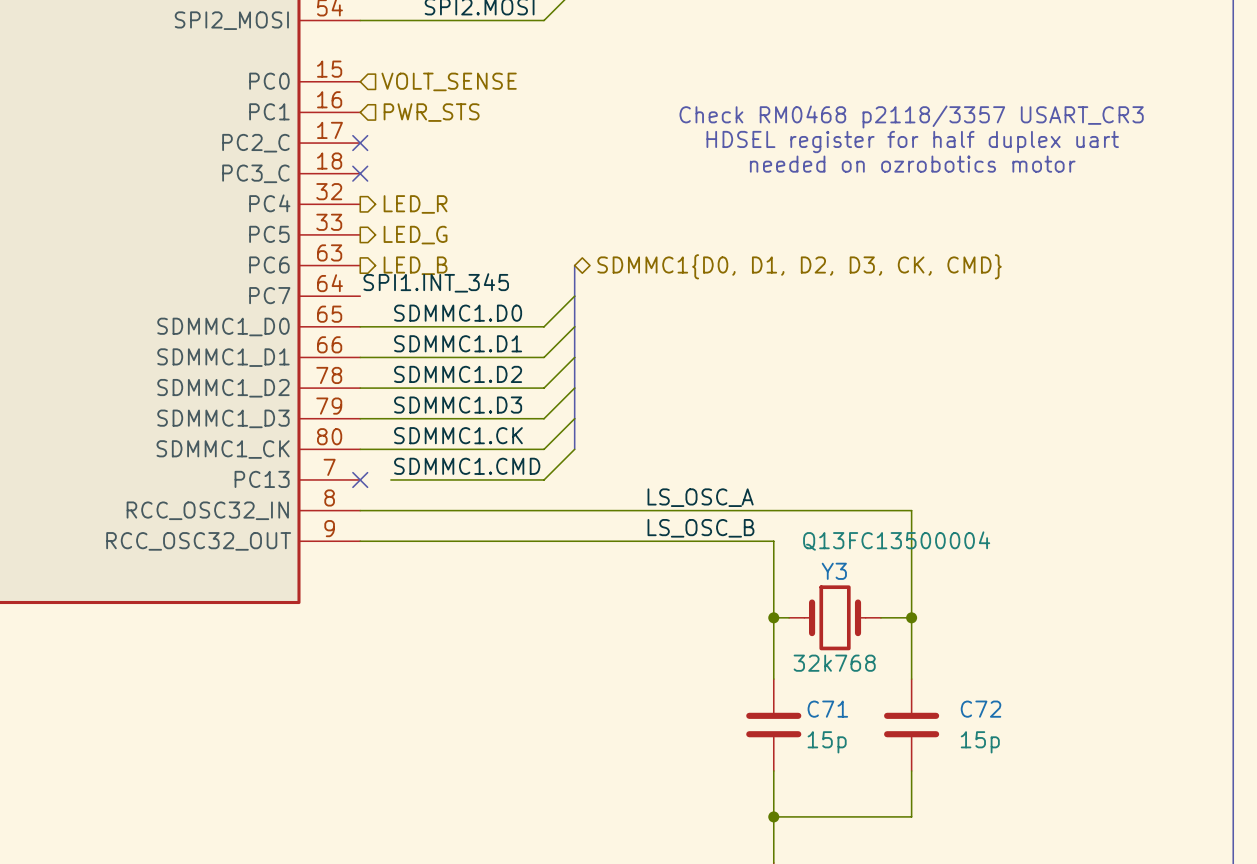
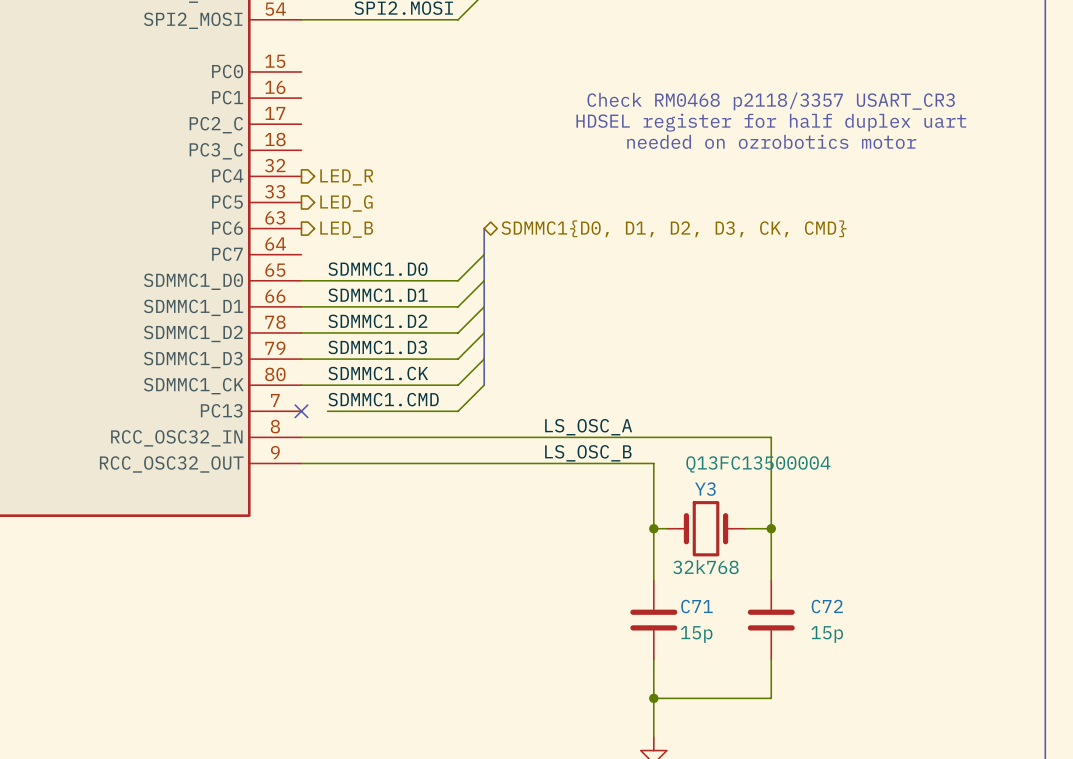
hierarchical label: VOLT_SENSE (449, 81) -> none
hierarchical label: PWR_STS (431, 112) -> none
no-connect mark: (360, 143) -> none
no-connect mark: (360, 173) -> none
label: SPI1.INT_345 (436, 282) -> none

